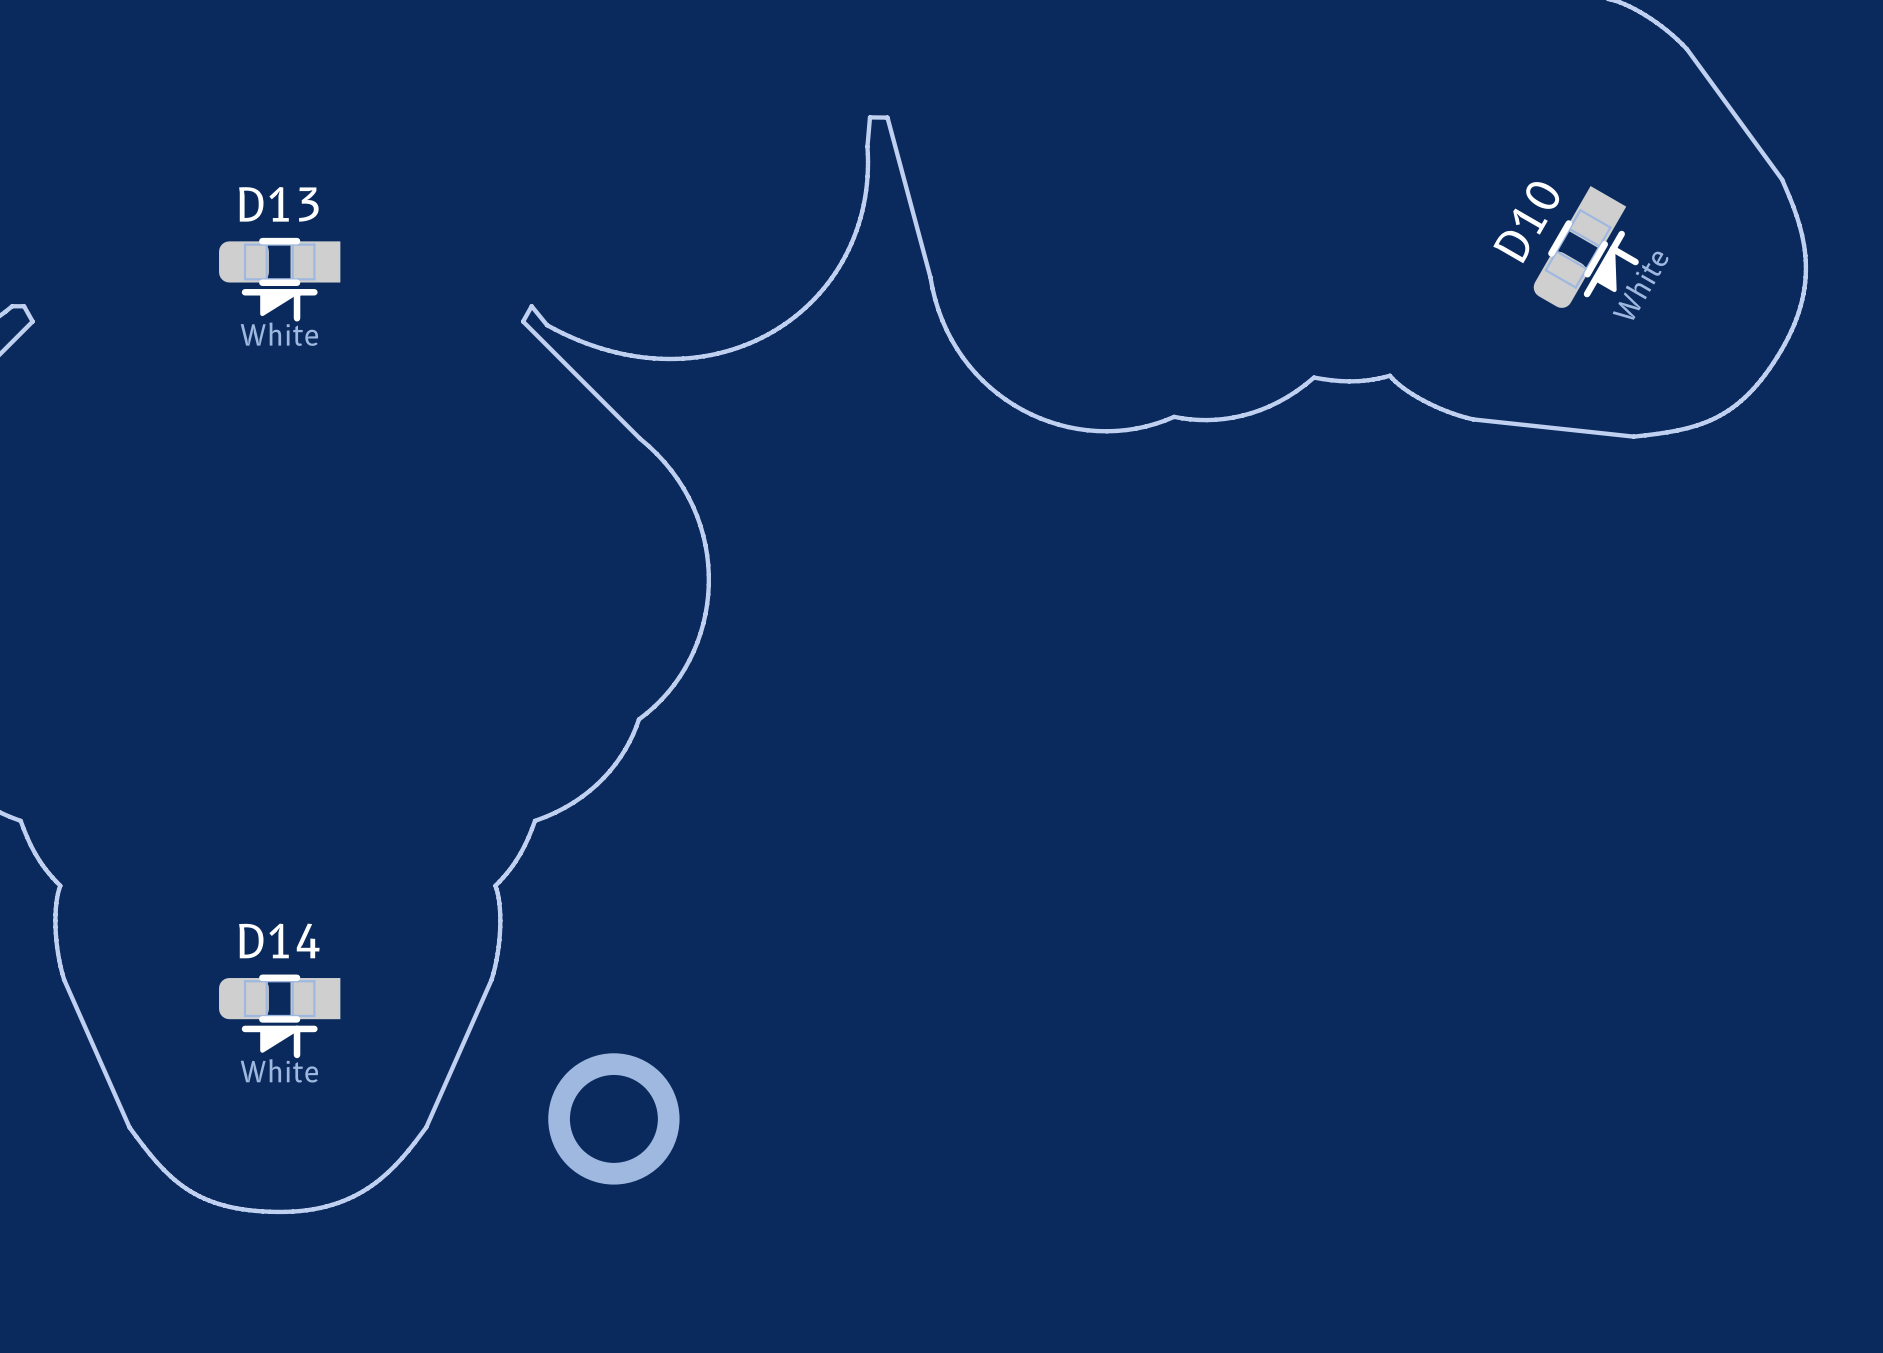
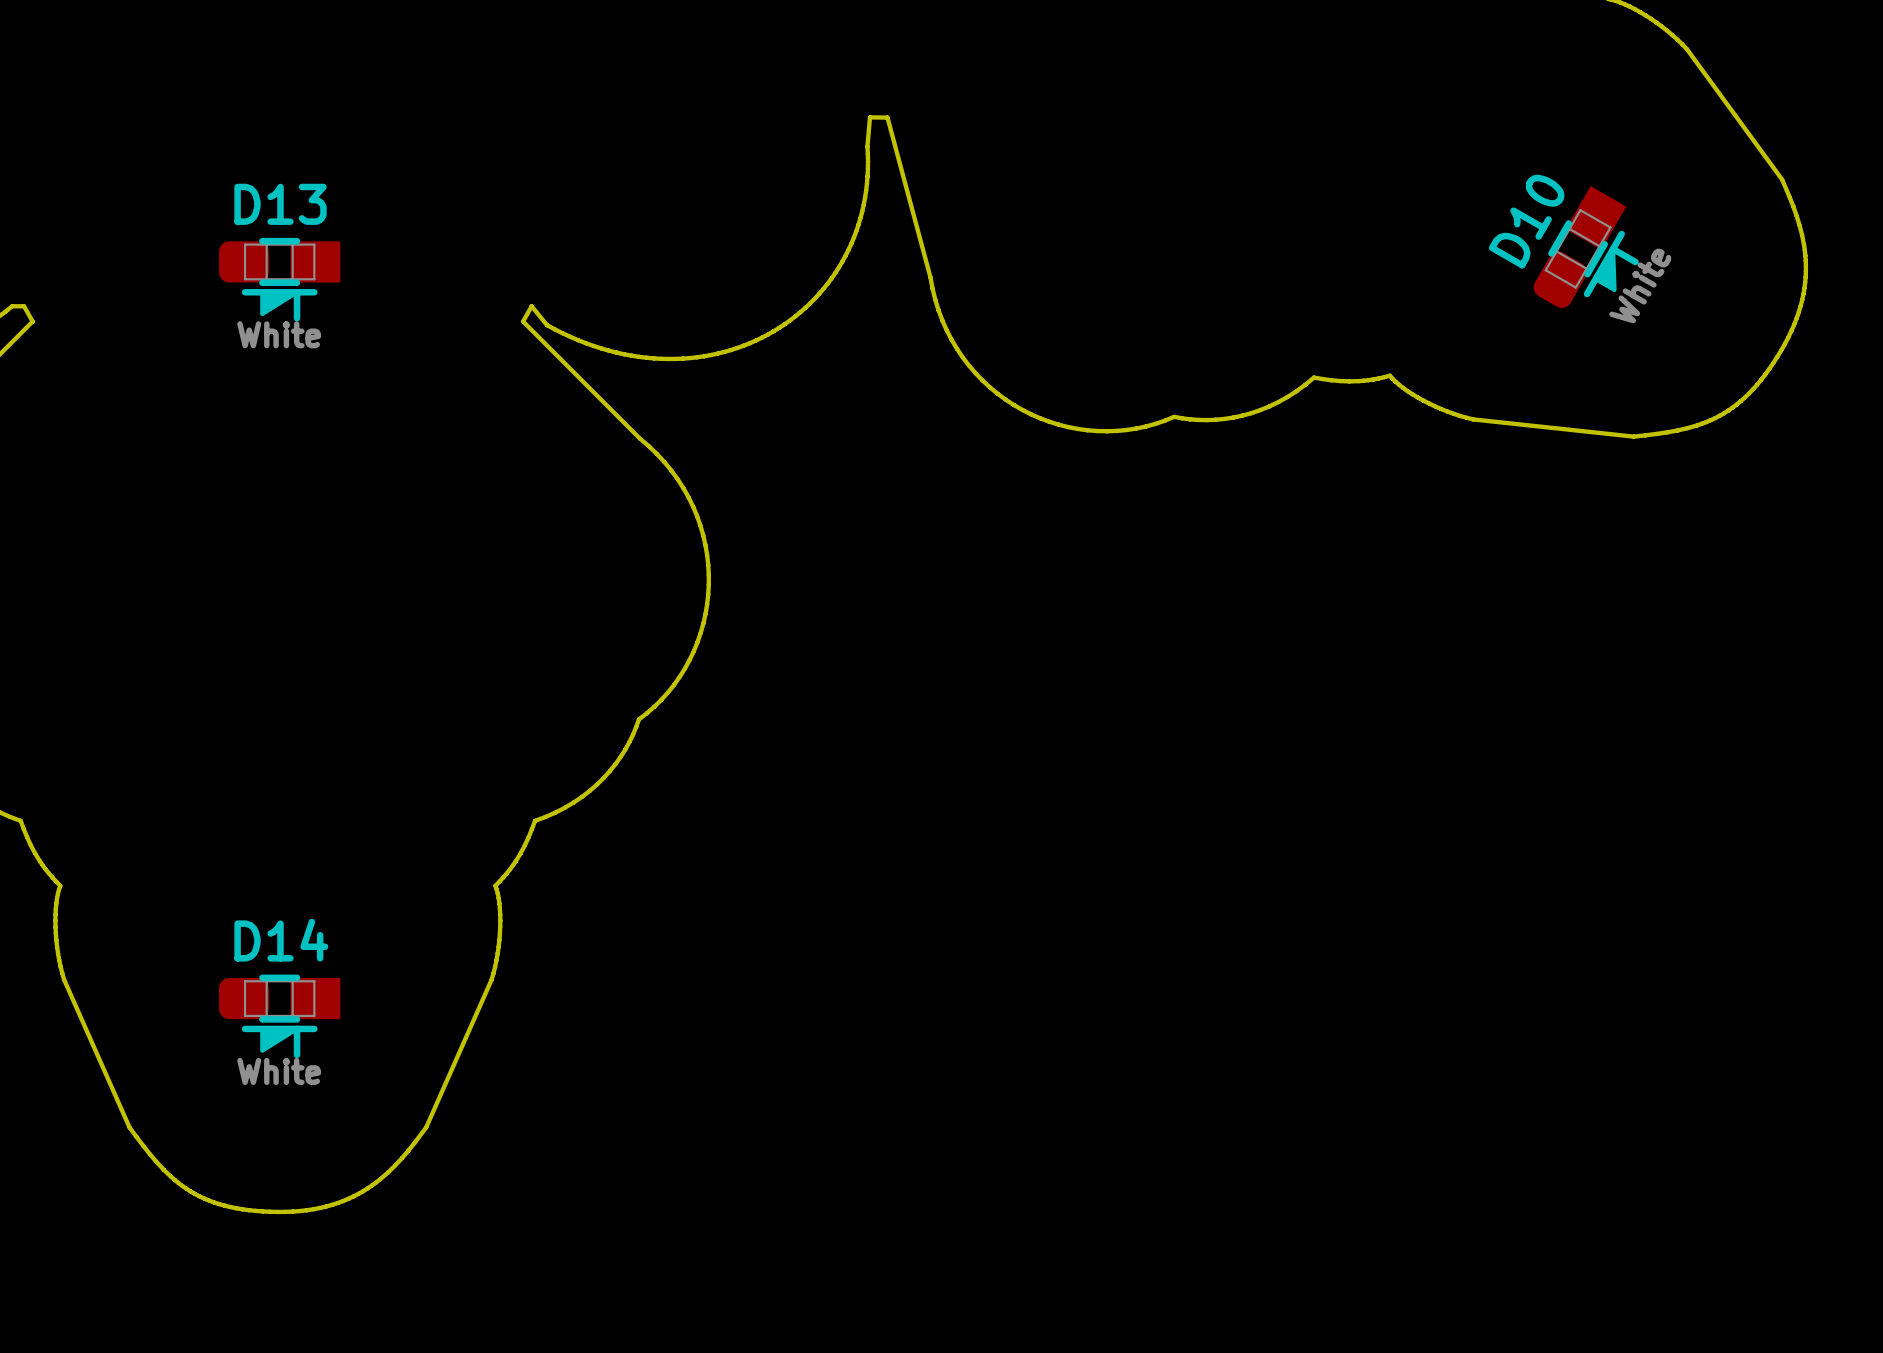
drawing: [548, 1053, 680, 1185] -> none

